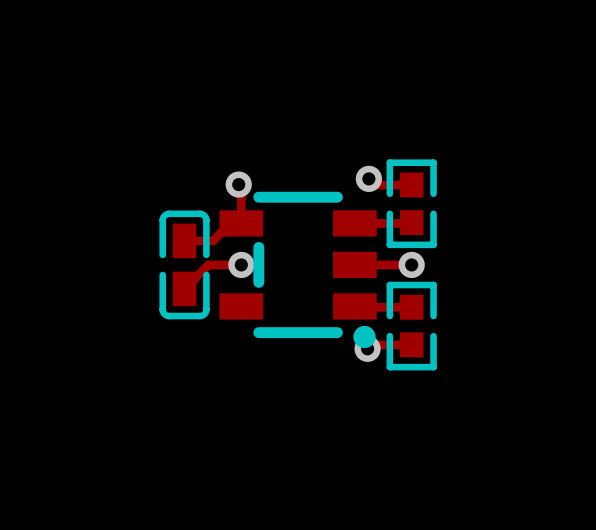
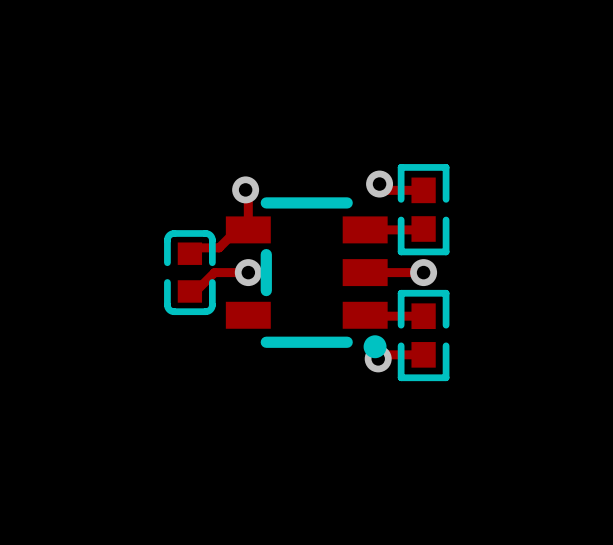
part footprint: [159, 210, 210, 320] -> [164, 230, 216, 316]

